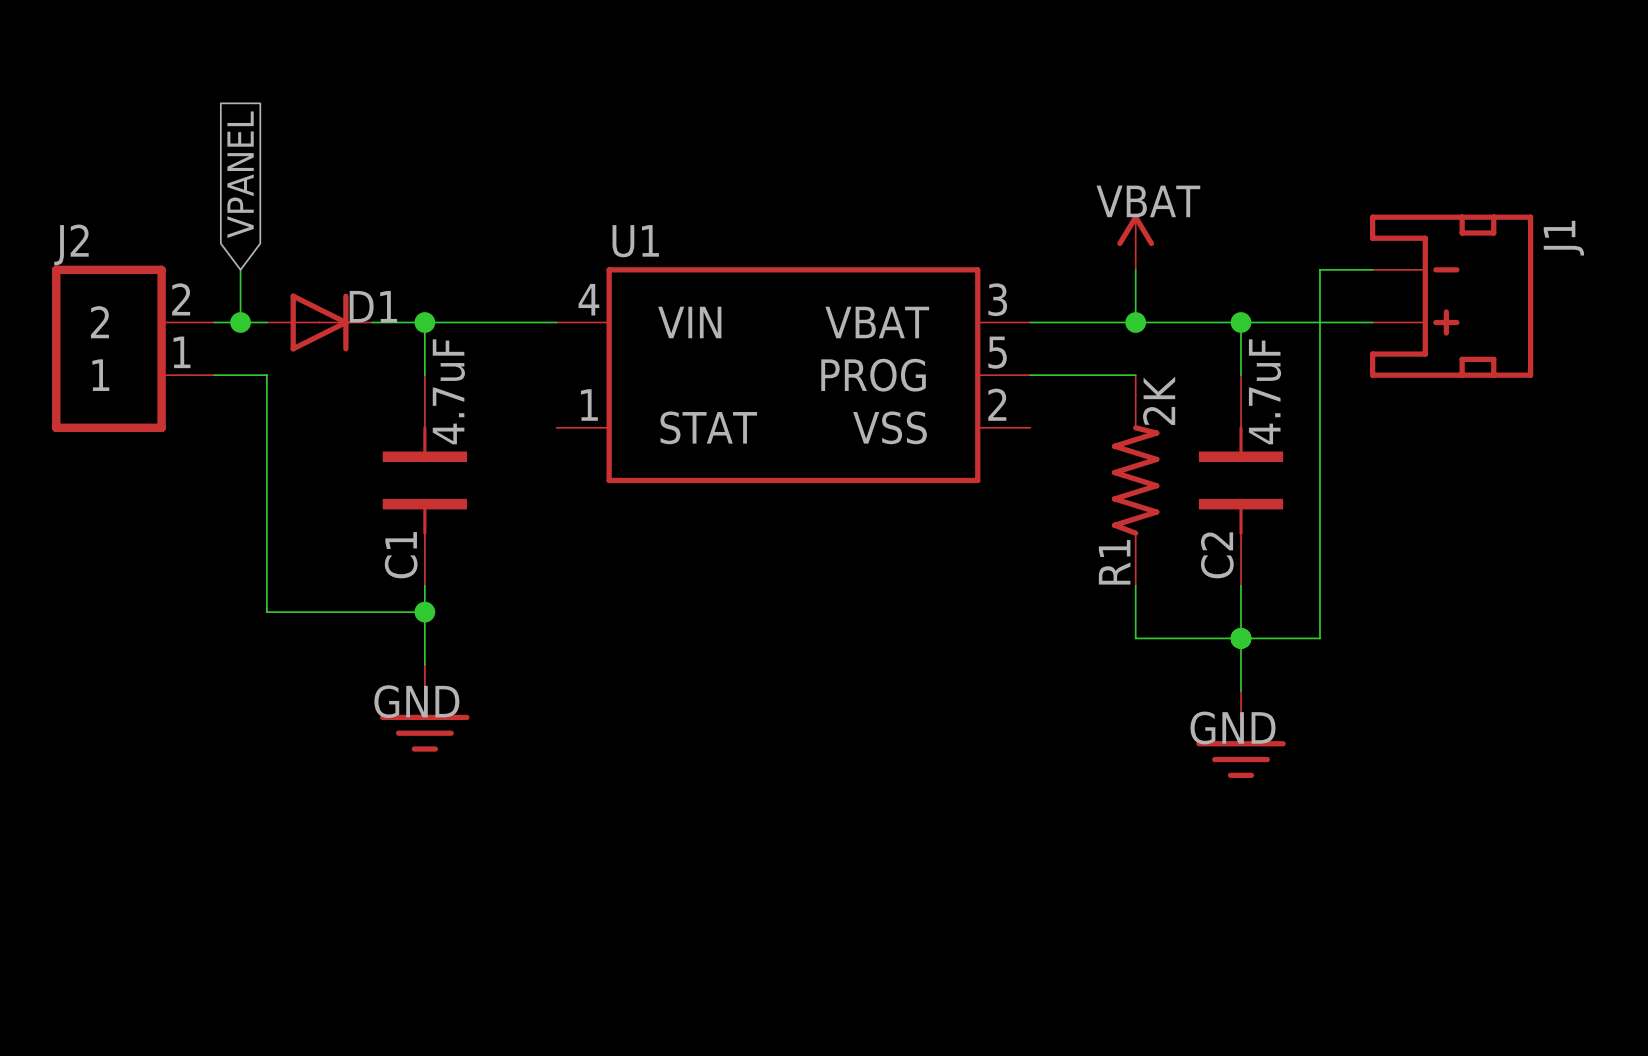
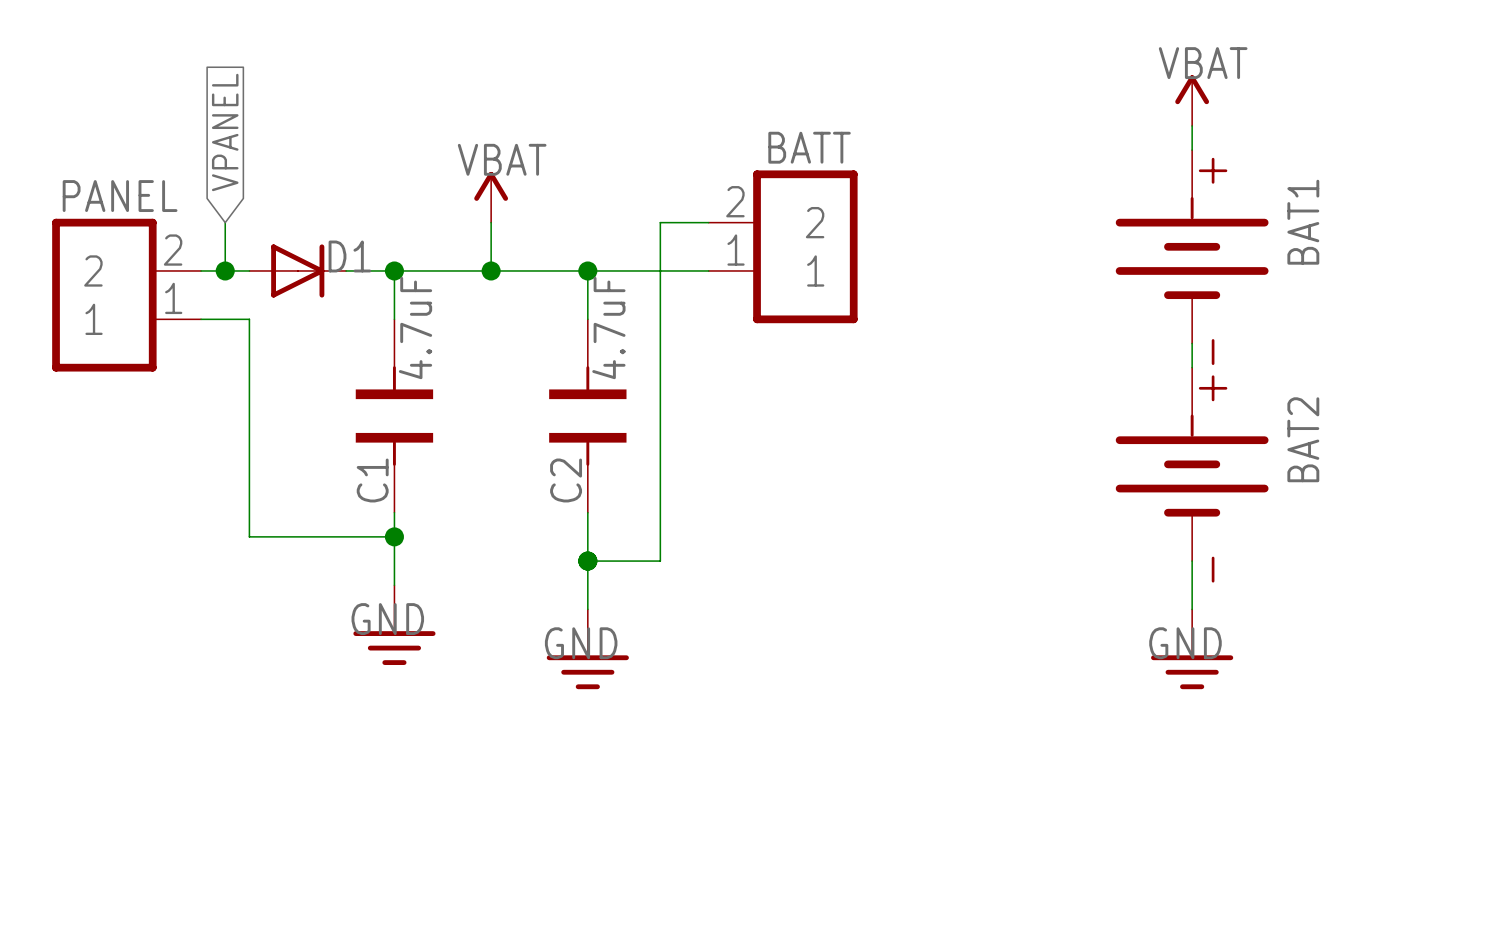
wire: none -> (1192, 125) (1192, 150)
power symbol: none -> (491, 197)
power symbol position: (1135, 242) -> (1192, 100)
J2 name: J2 (71, 244) -> PANEL (120, 196)
wire: none -> (491, 222) (491, 270)
wire: none -> (708, 222) (660, 222) (660, 561) (587, 561)
wire: (1135, 269) (1135, 322) -> (587, 270) (587, 319)
wire: (1372, 269) (1319, 269) (1319, 638) (1135, 638) (1135, 585) -> none
BATT: none -> (783, 246)
BAT1: none -> (1192, 246)
J1: (1451, 296) -> none
junction: none -> (491, 270)
wire: none -> (515, 270) (708, 270)
junction: none -> (587, 270)
wire: (1030, 322) (1372, 322) -> none
junction: (1135, 322) -> none
wire: (1241, 322) (1241, 375) -> (1192, 561) (1192, 609)
junction: (1241, 322) -> none
U1: (793, 375) -> none
wire: (1030, 375) (1135, 375) -> none
wire: none -> (1192, 343) (1192, 367)
R1: 2K (1135, 480) -> none
C2 position: (1241, 480) -> (587, 416)
BAT2: none -> (1192, 464)
wire: none -> (587, 512) (587, 609)
wire: (1241, 585) (1241, 691) -> none
junction: none -> (587, 561)
junction: (1241, 638) -> none
power symbol: none -> GND (587, 649)
power symbol position: GND (1241, 734) -> GND (1192, 649)

